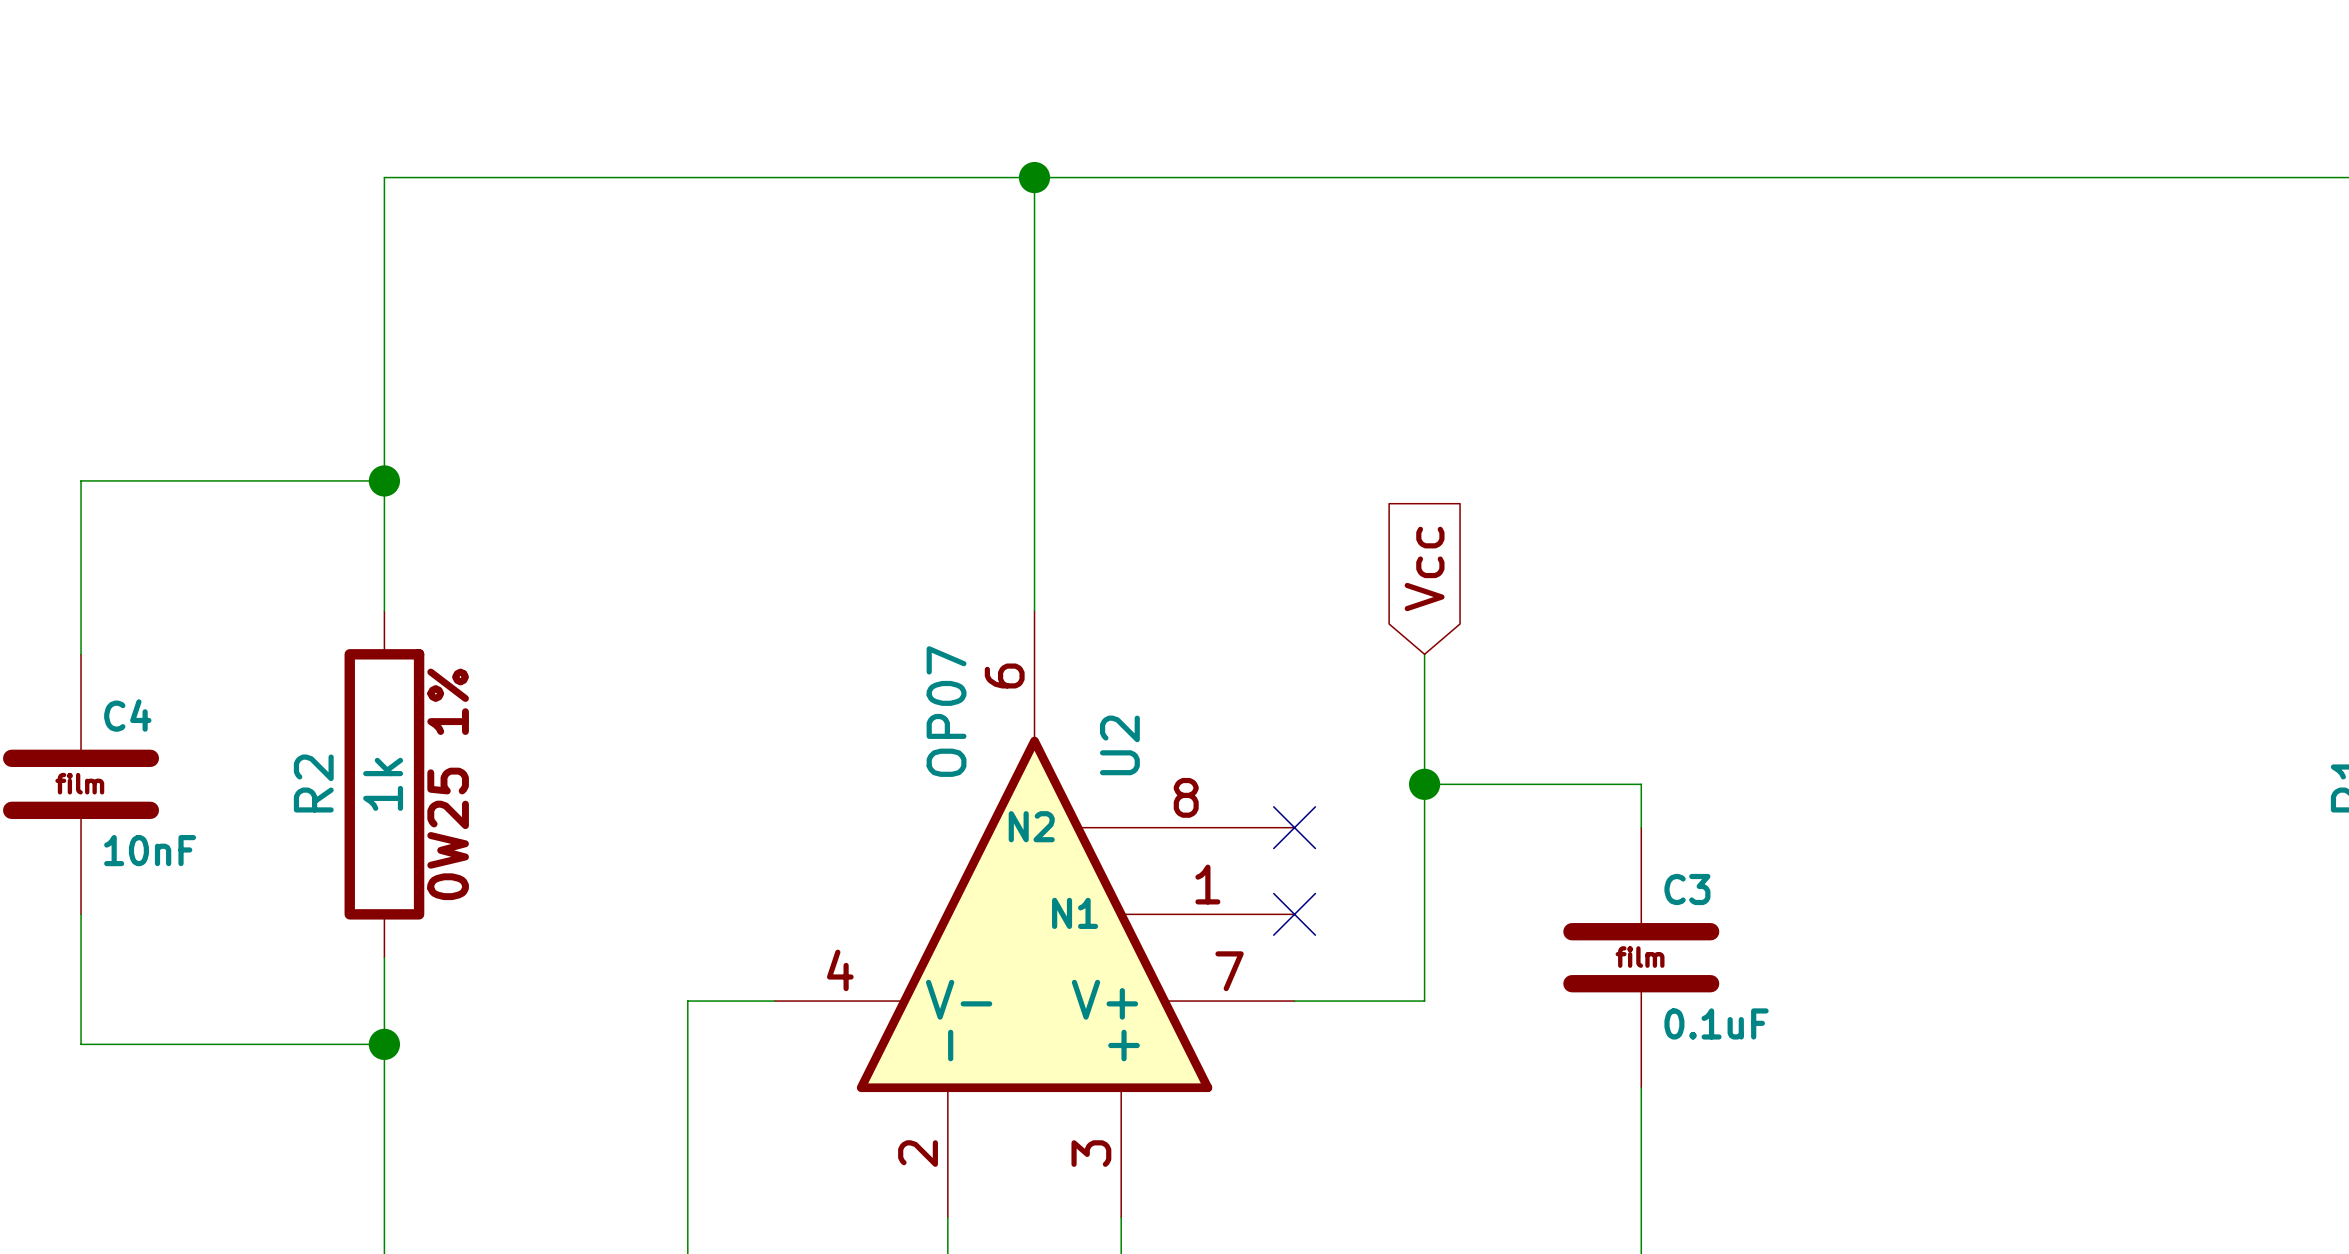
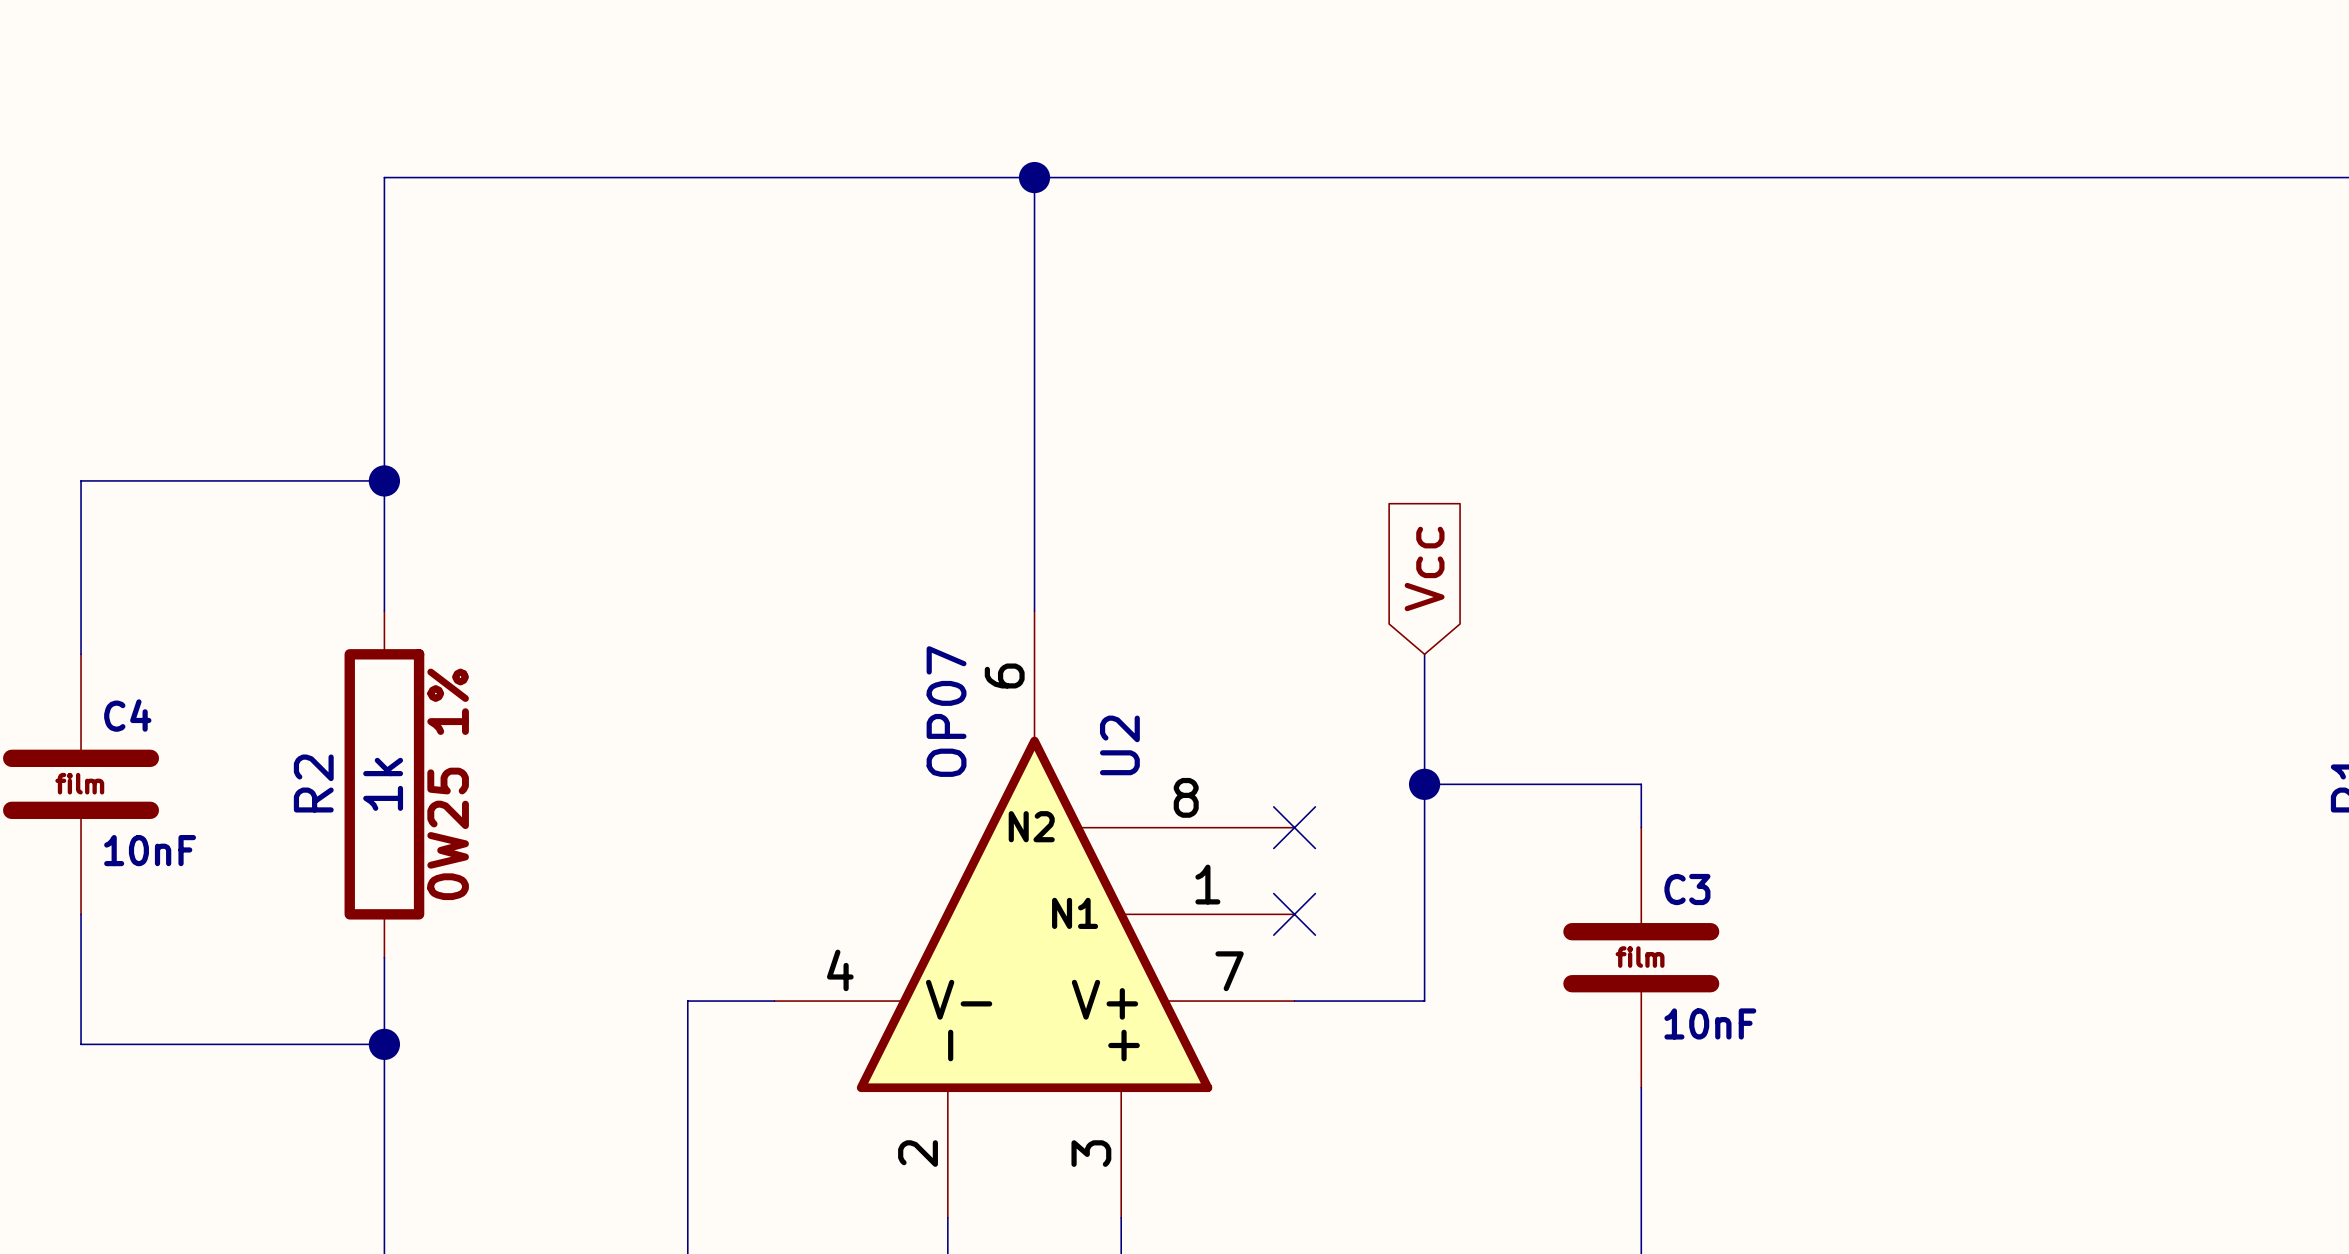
C3 value: 0.1uF (1716, 1023) -> 10nF (1710, 1023)

